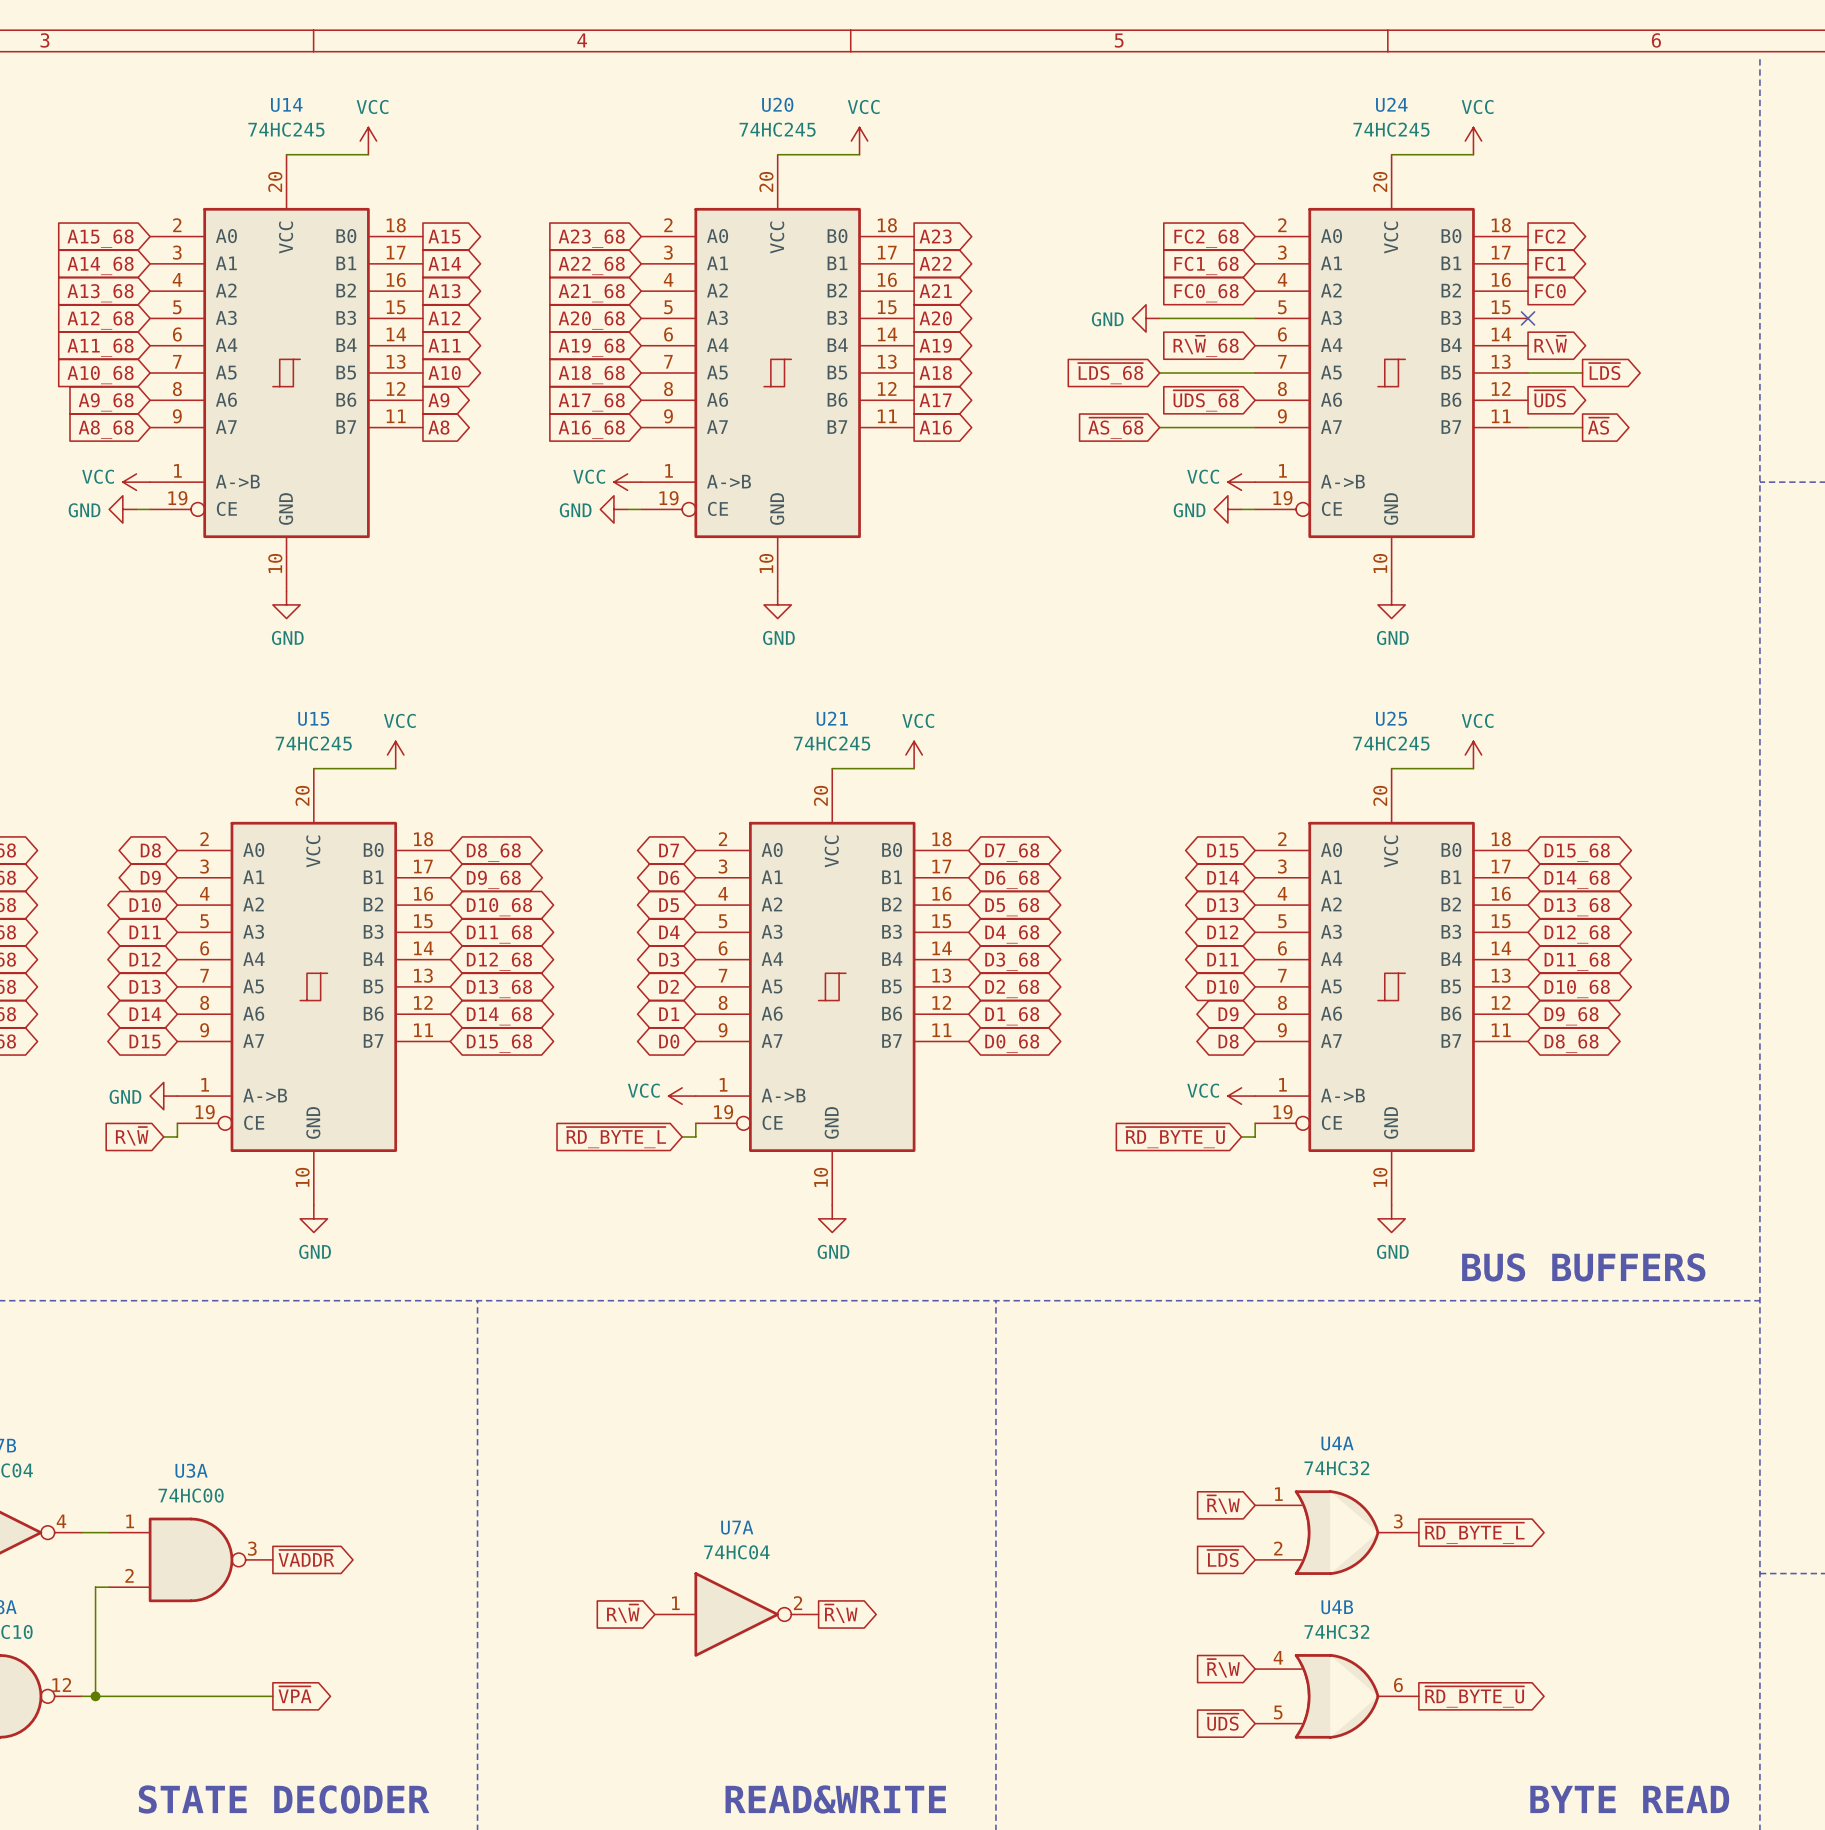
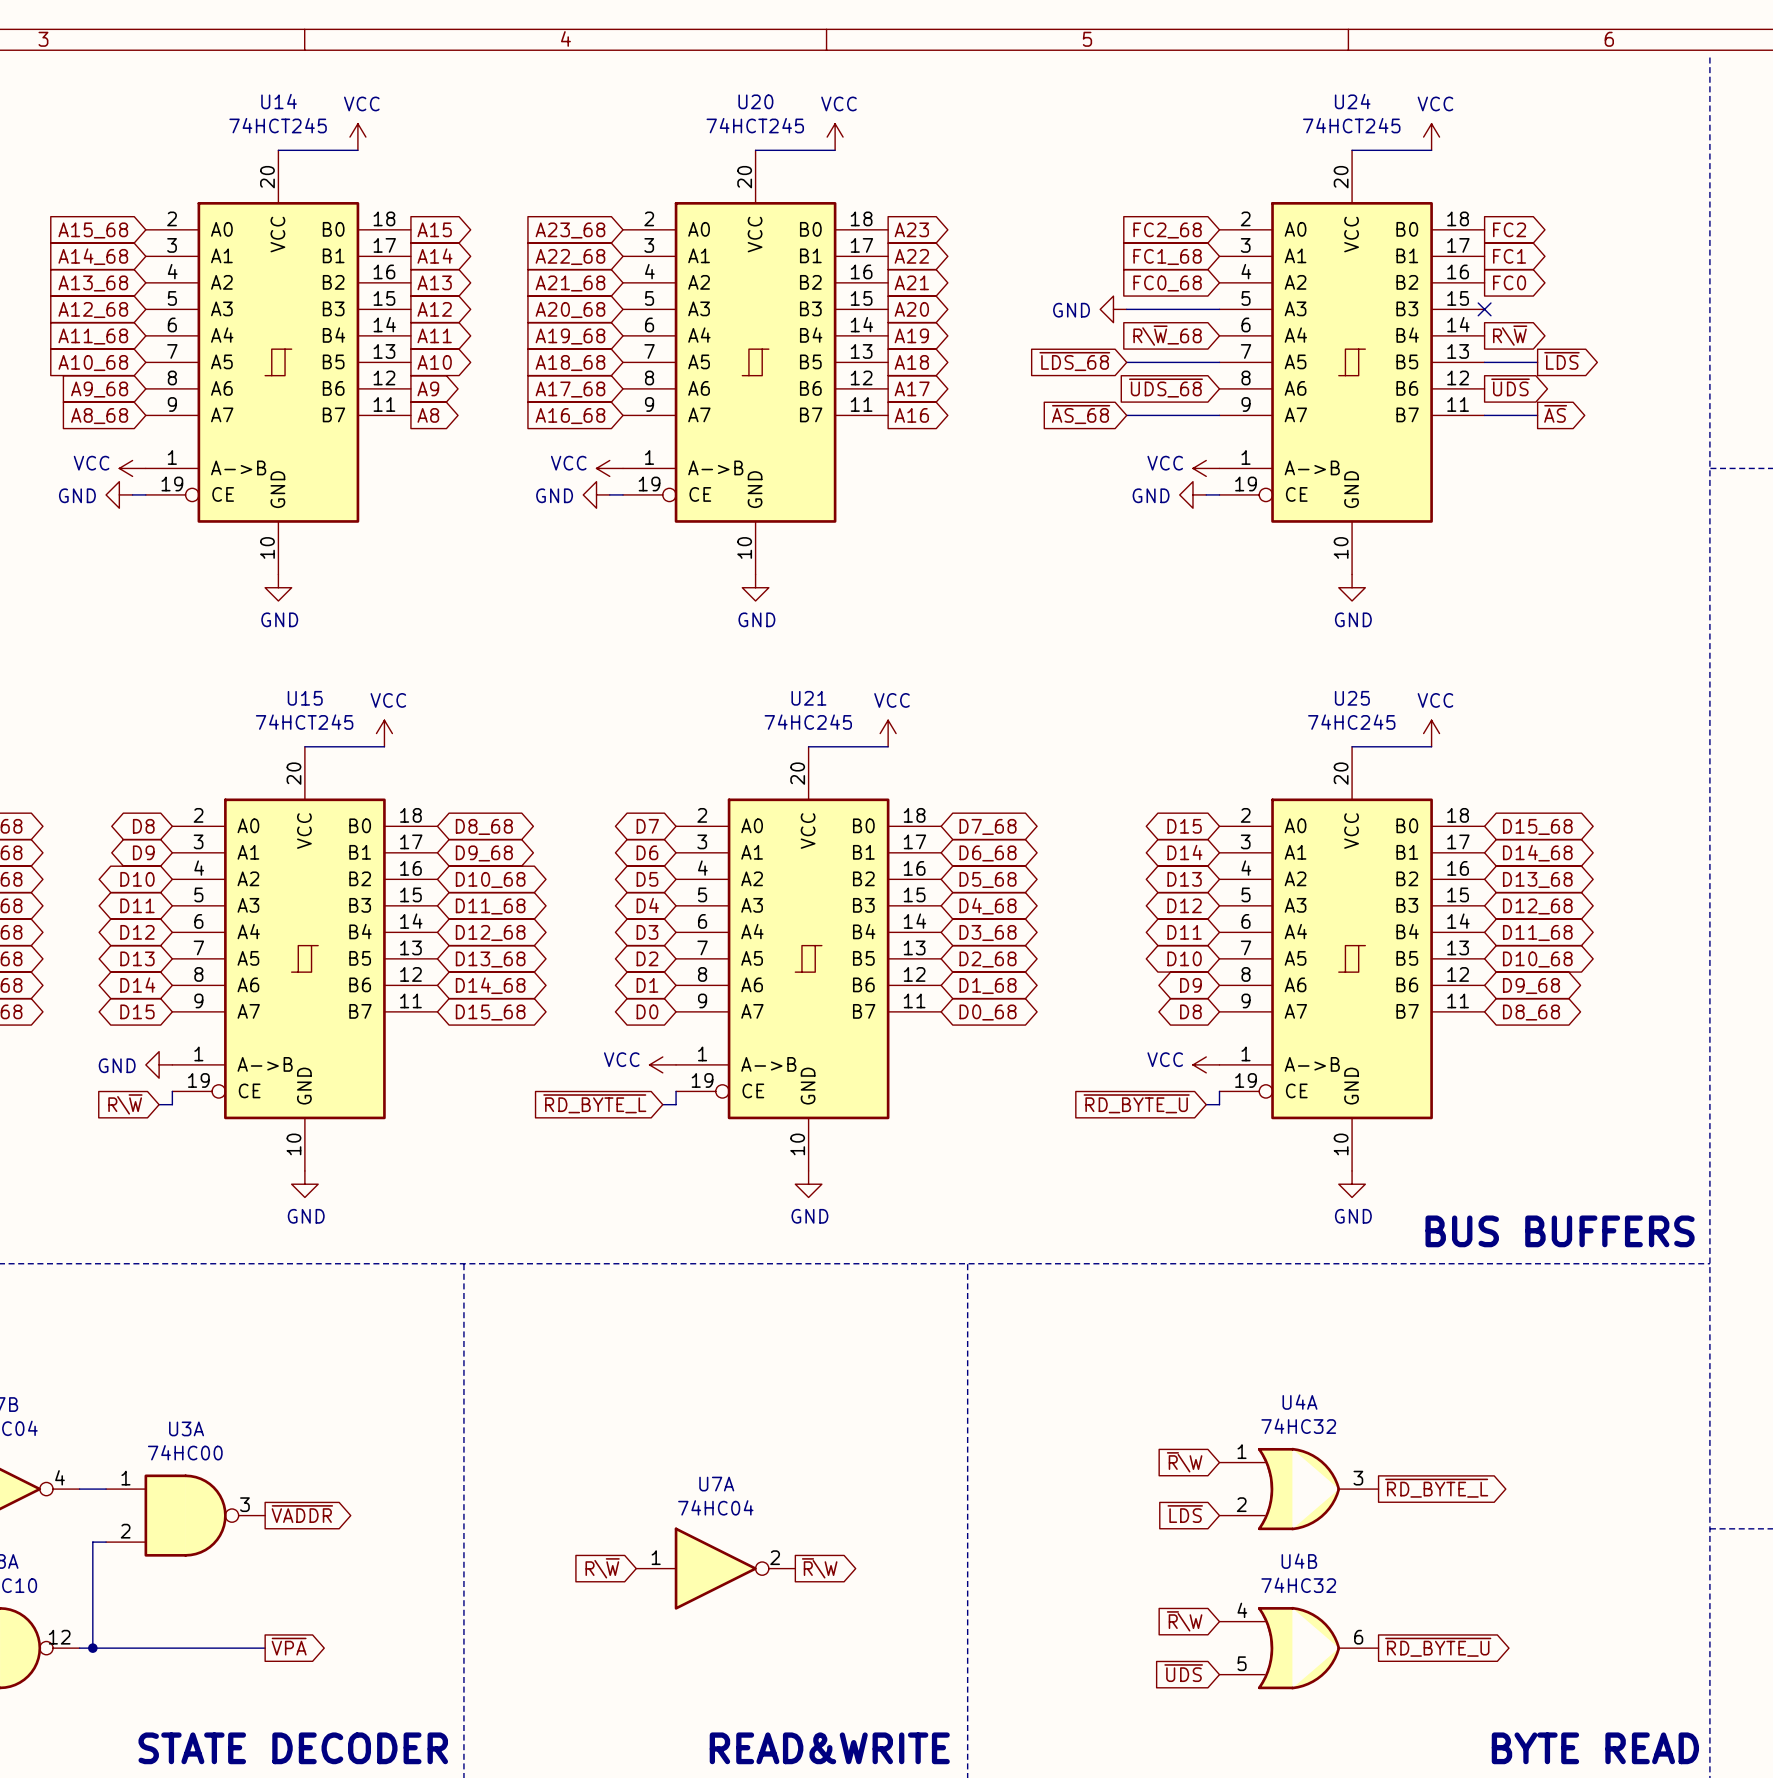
U14 value: 74HC245 (286, 129) -> 74HCT245 (278, 125)
U20 value: 74HC245 (777, 129) -> 74HCT245 (755, 125)
U24 value: 74HC245 (1391, 129) -> 74HCT245 (1351, 125)
U15 value: 74HC245 (313, 743) -> 74HCT245 (304, 722)

